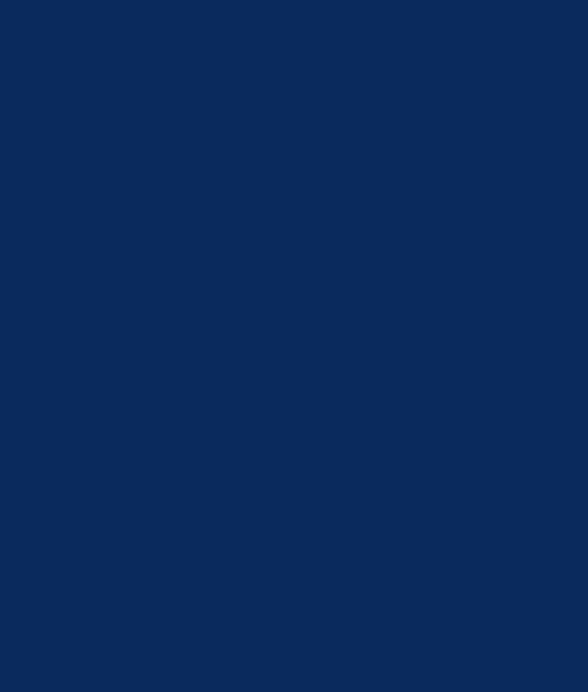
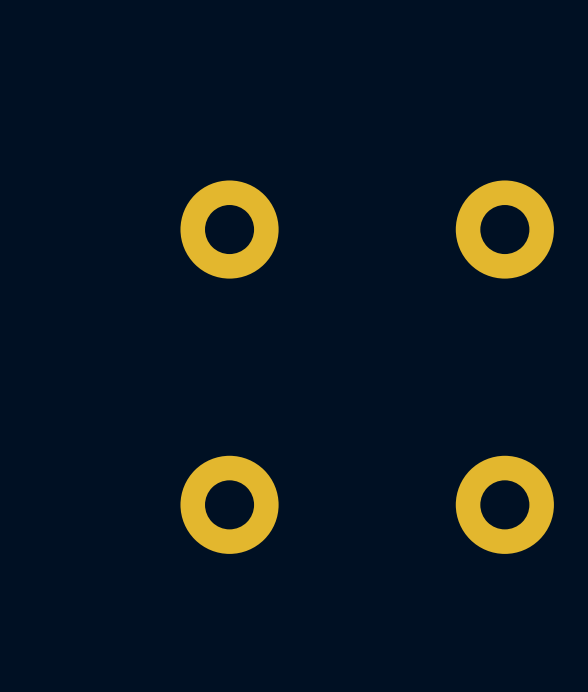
part: none -> (229, 229)
part: none -> (504, 229)
part: none -> (229, 504)
part: none -> (504, 504)

